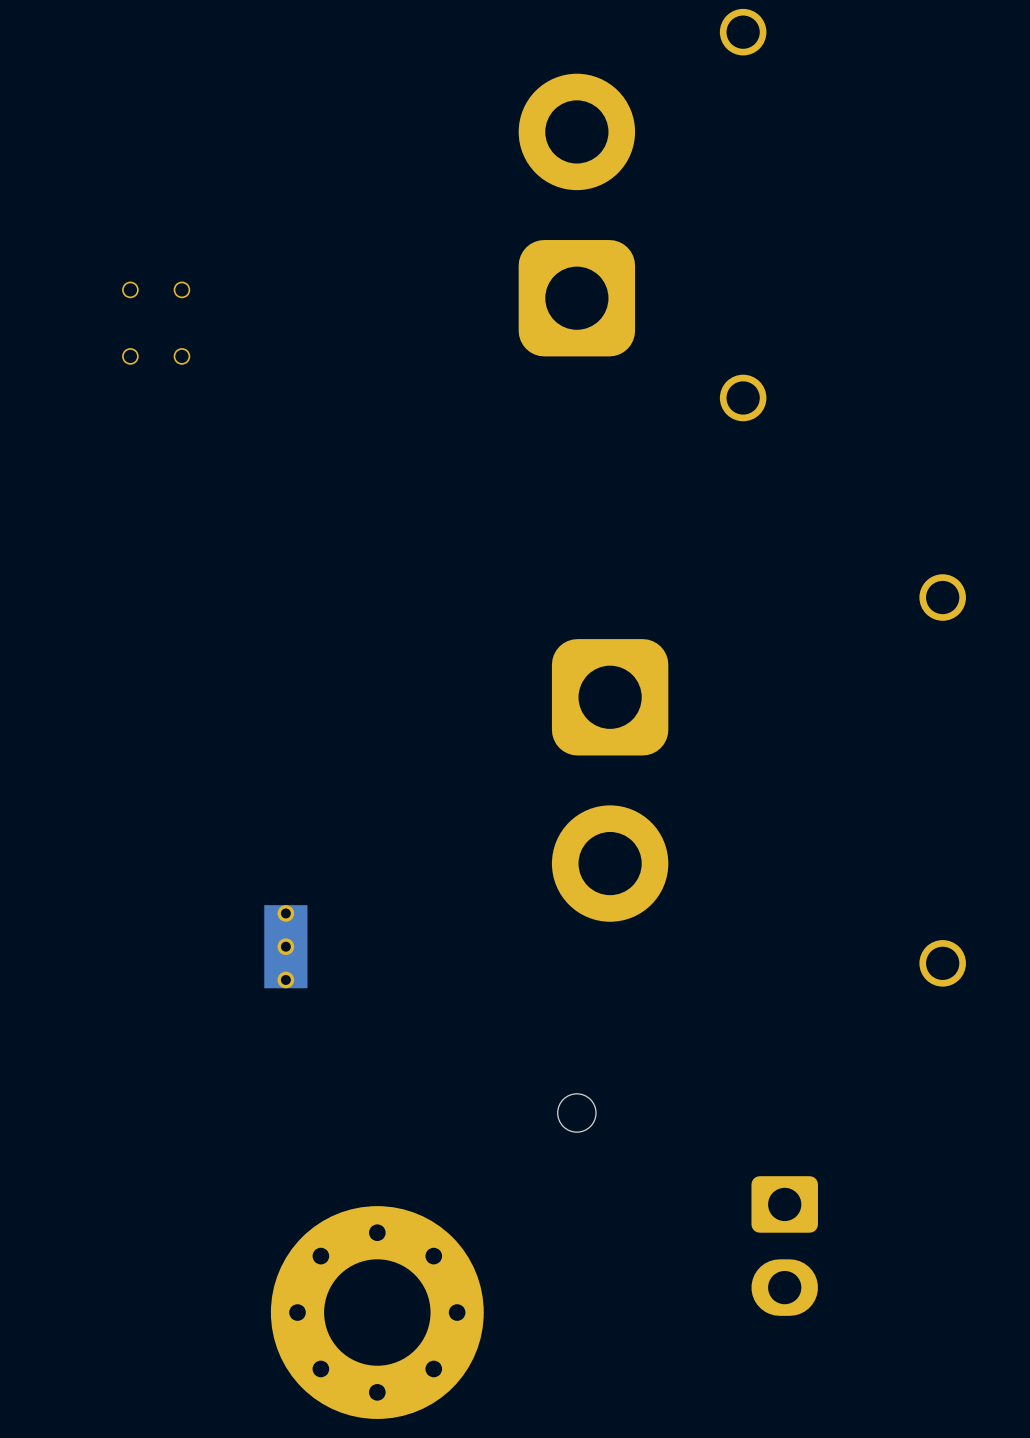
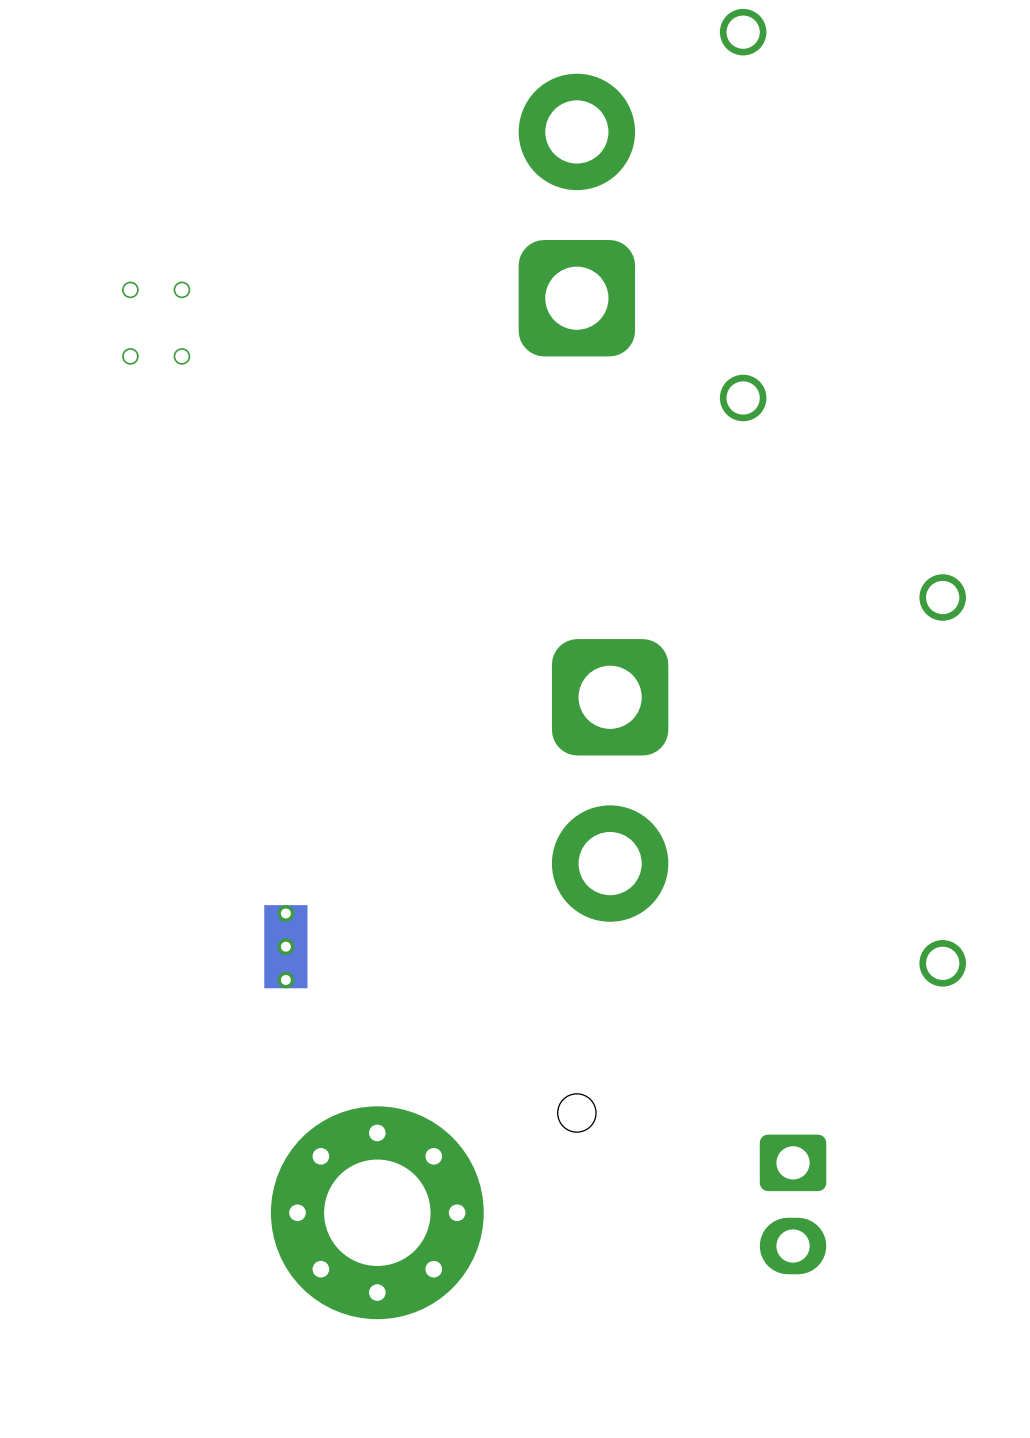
part position: (784, 1246) -> (793, 1204)
part position: (377, 1312) -> (377, 1212)

